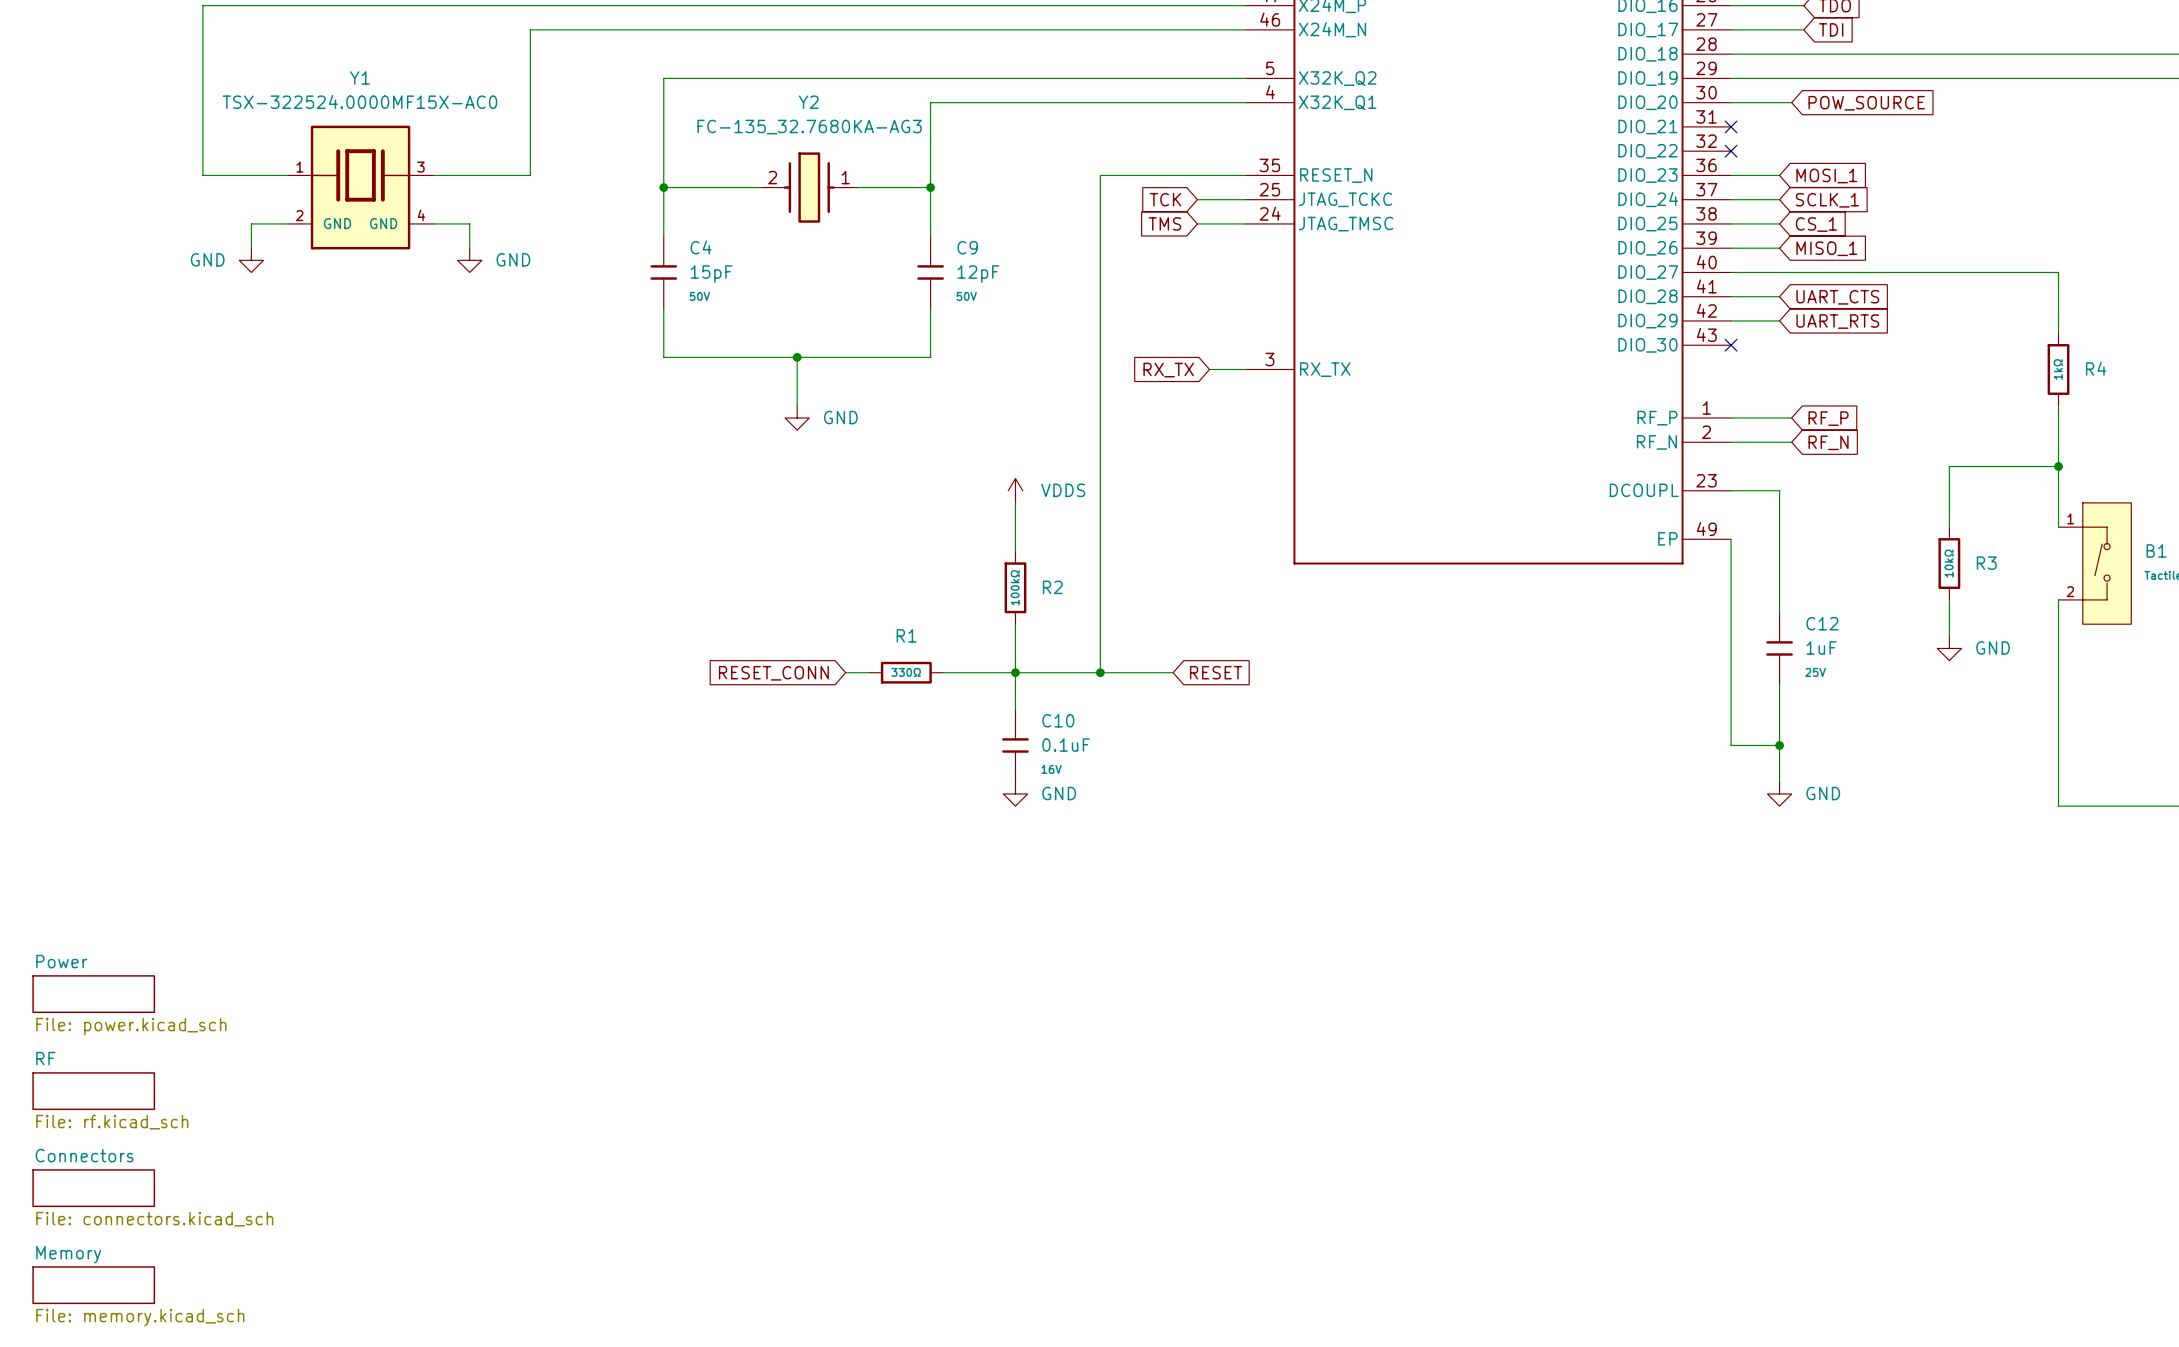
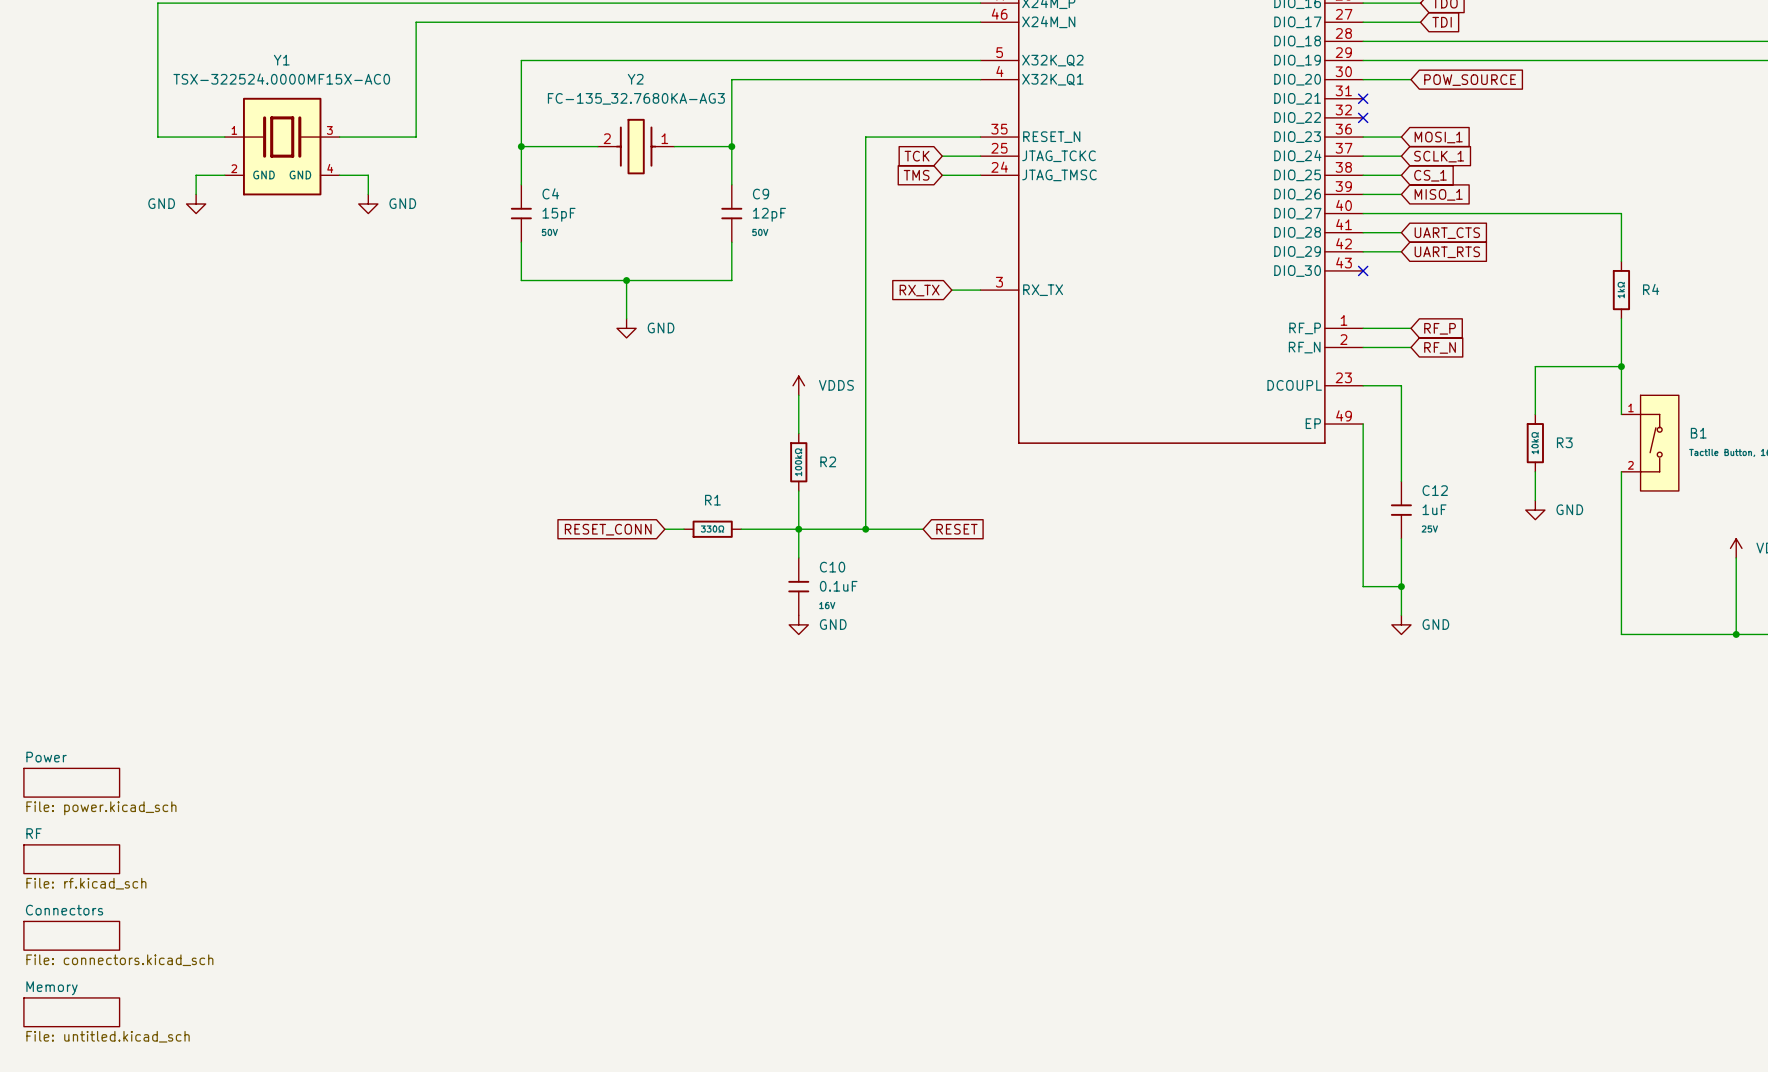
sheet Memory value: File: memory.kicad_sch (140, 1317) -> File: untitled.kicad_sch (108, 1036)

